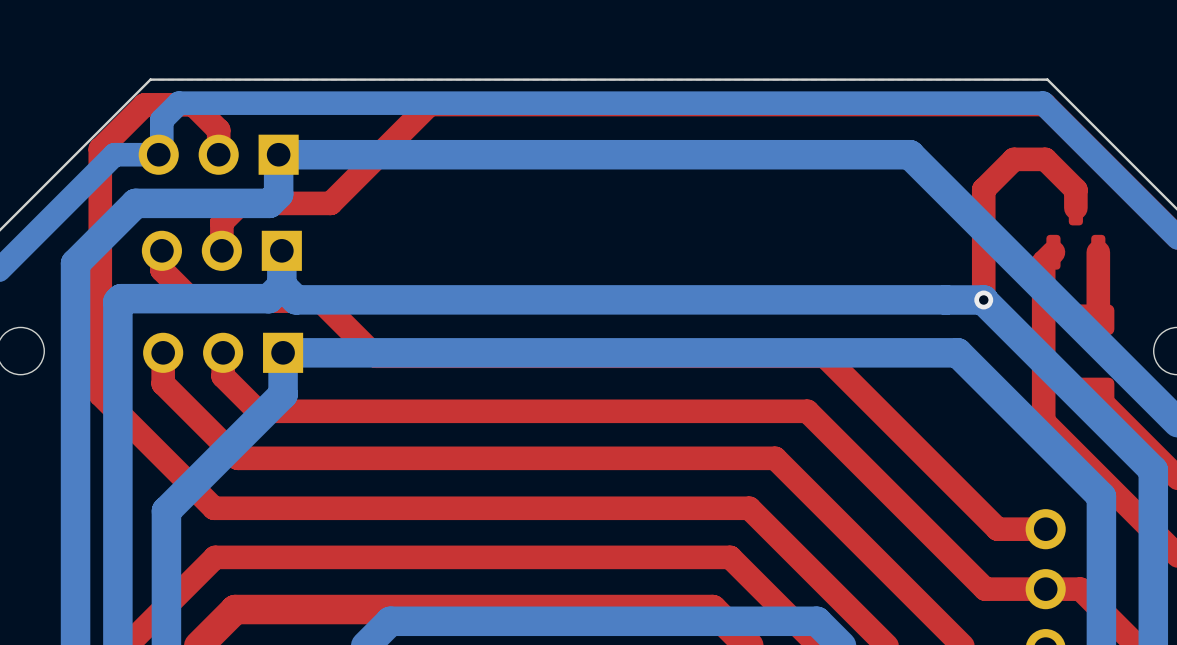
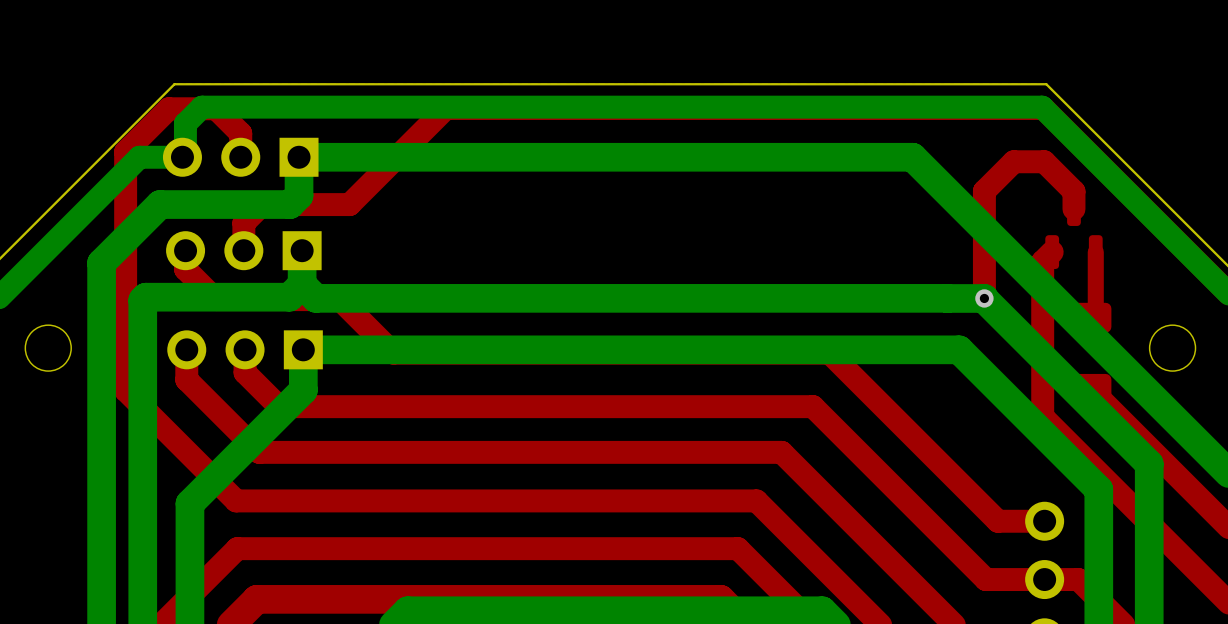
top track width: thick (1098, 252) (1098, 315) (1093, 319) -> thin (1095, 252) (1095, 313) (1091, 317)

